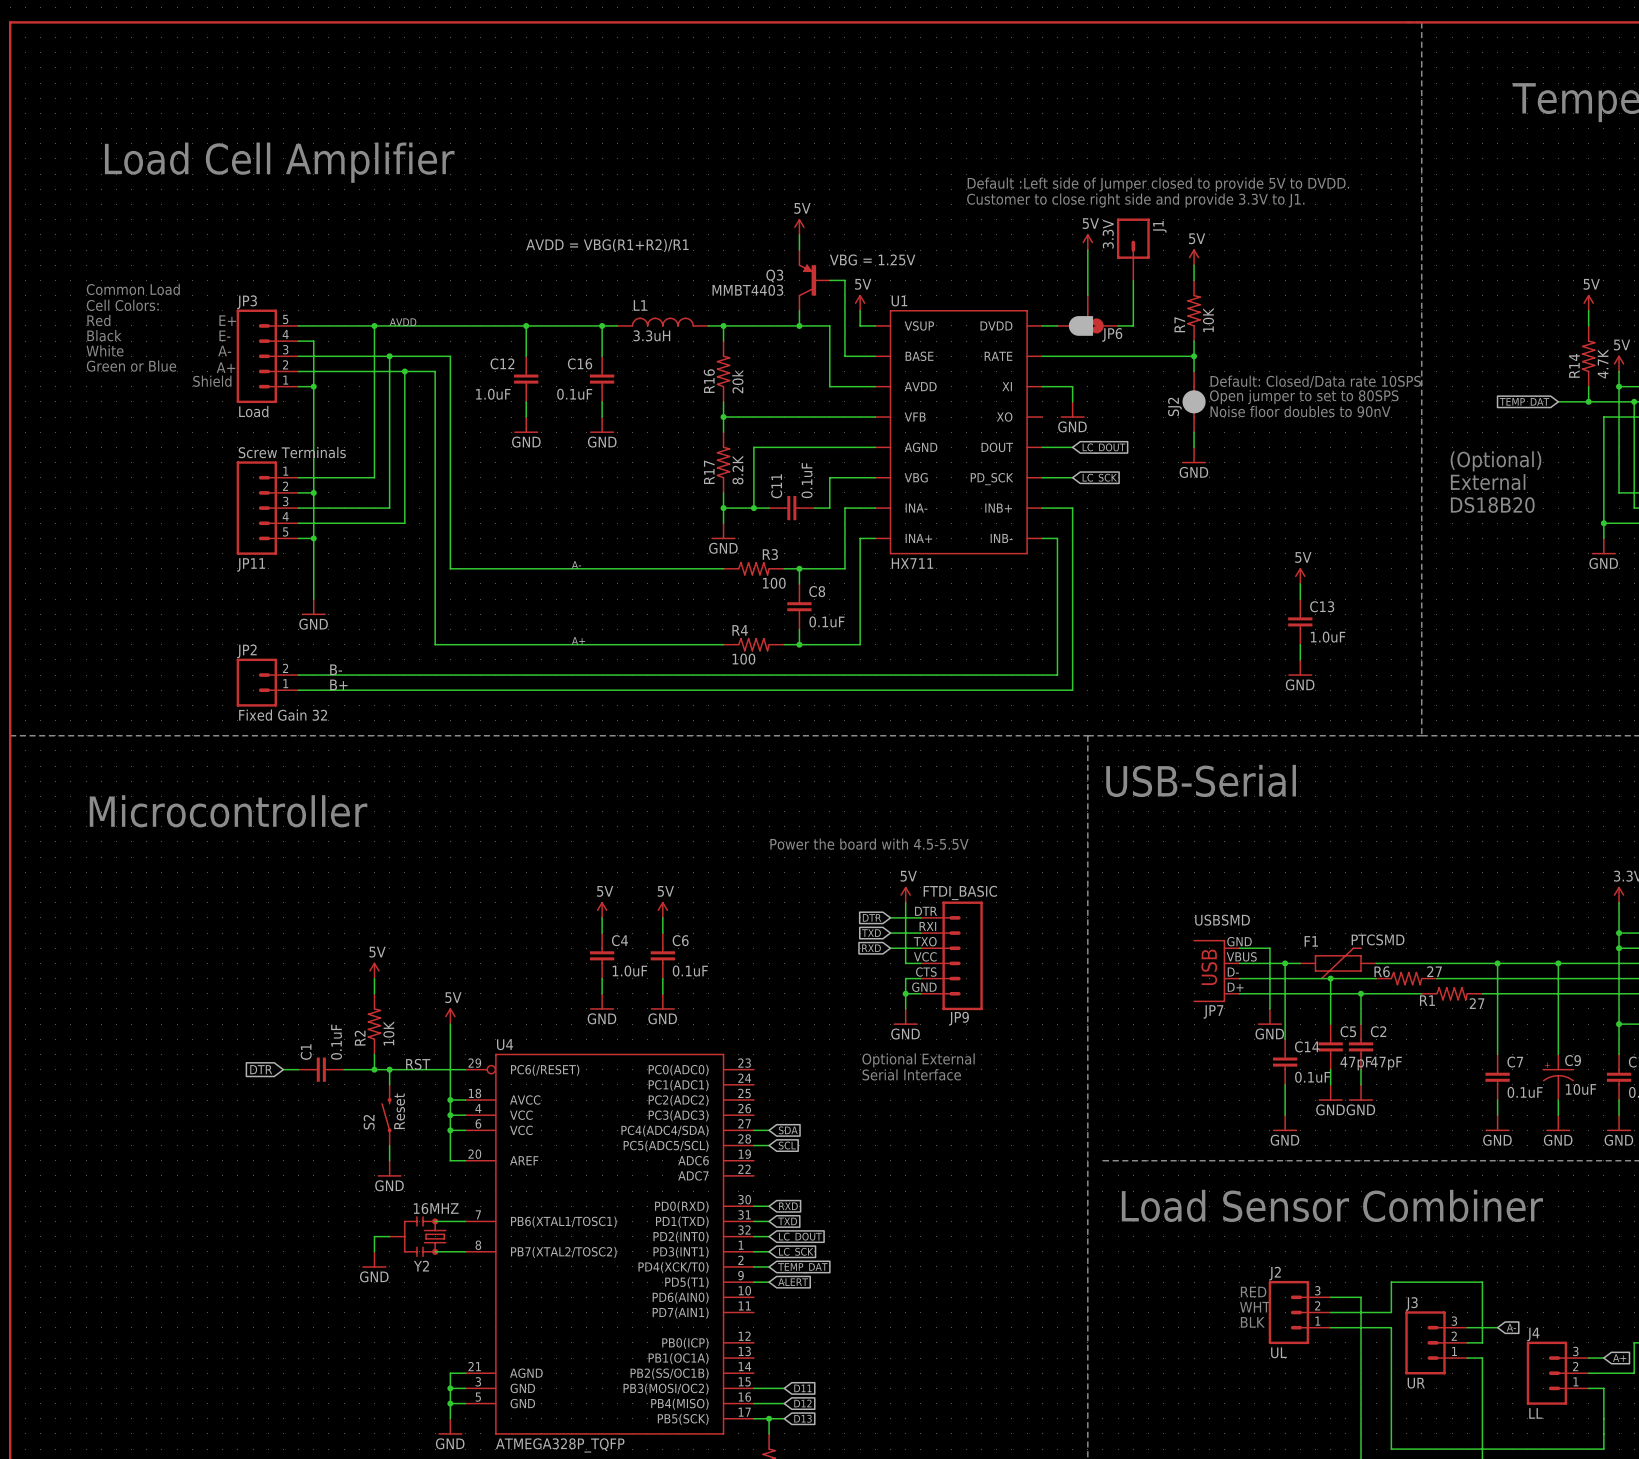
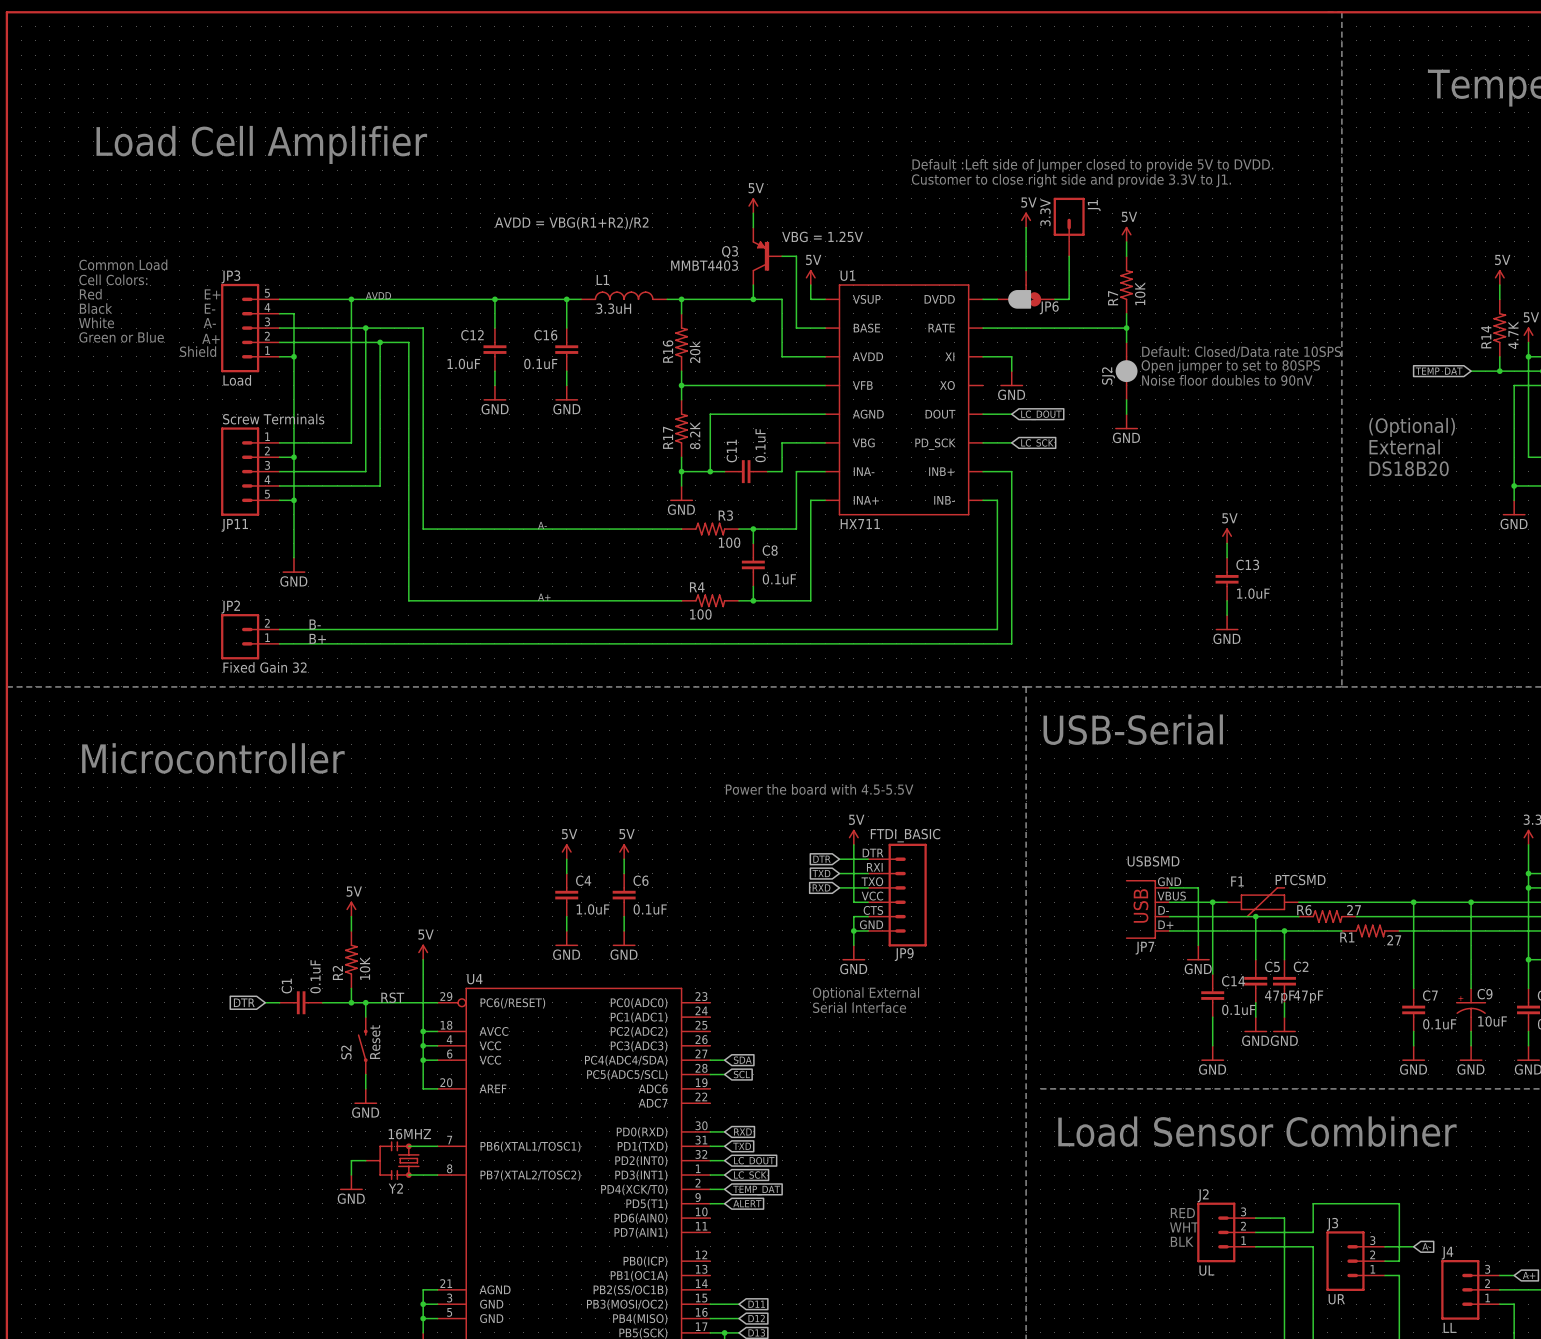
text: AVDD = VBG(R1+R2)/R1 (607, 245) -> AVDD = VBG(R1+R2)/R2 (571, 223)

